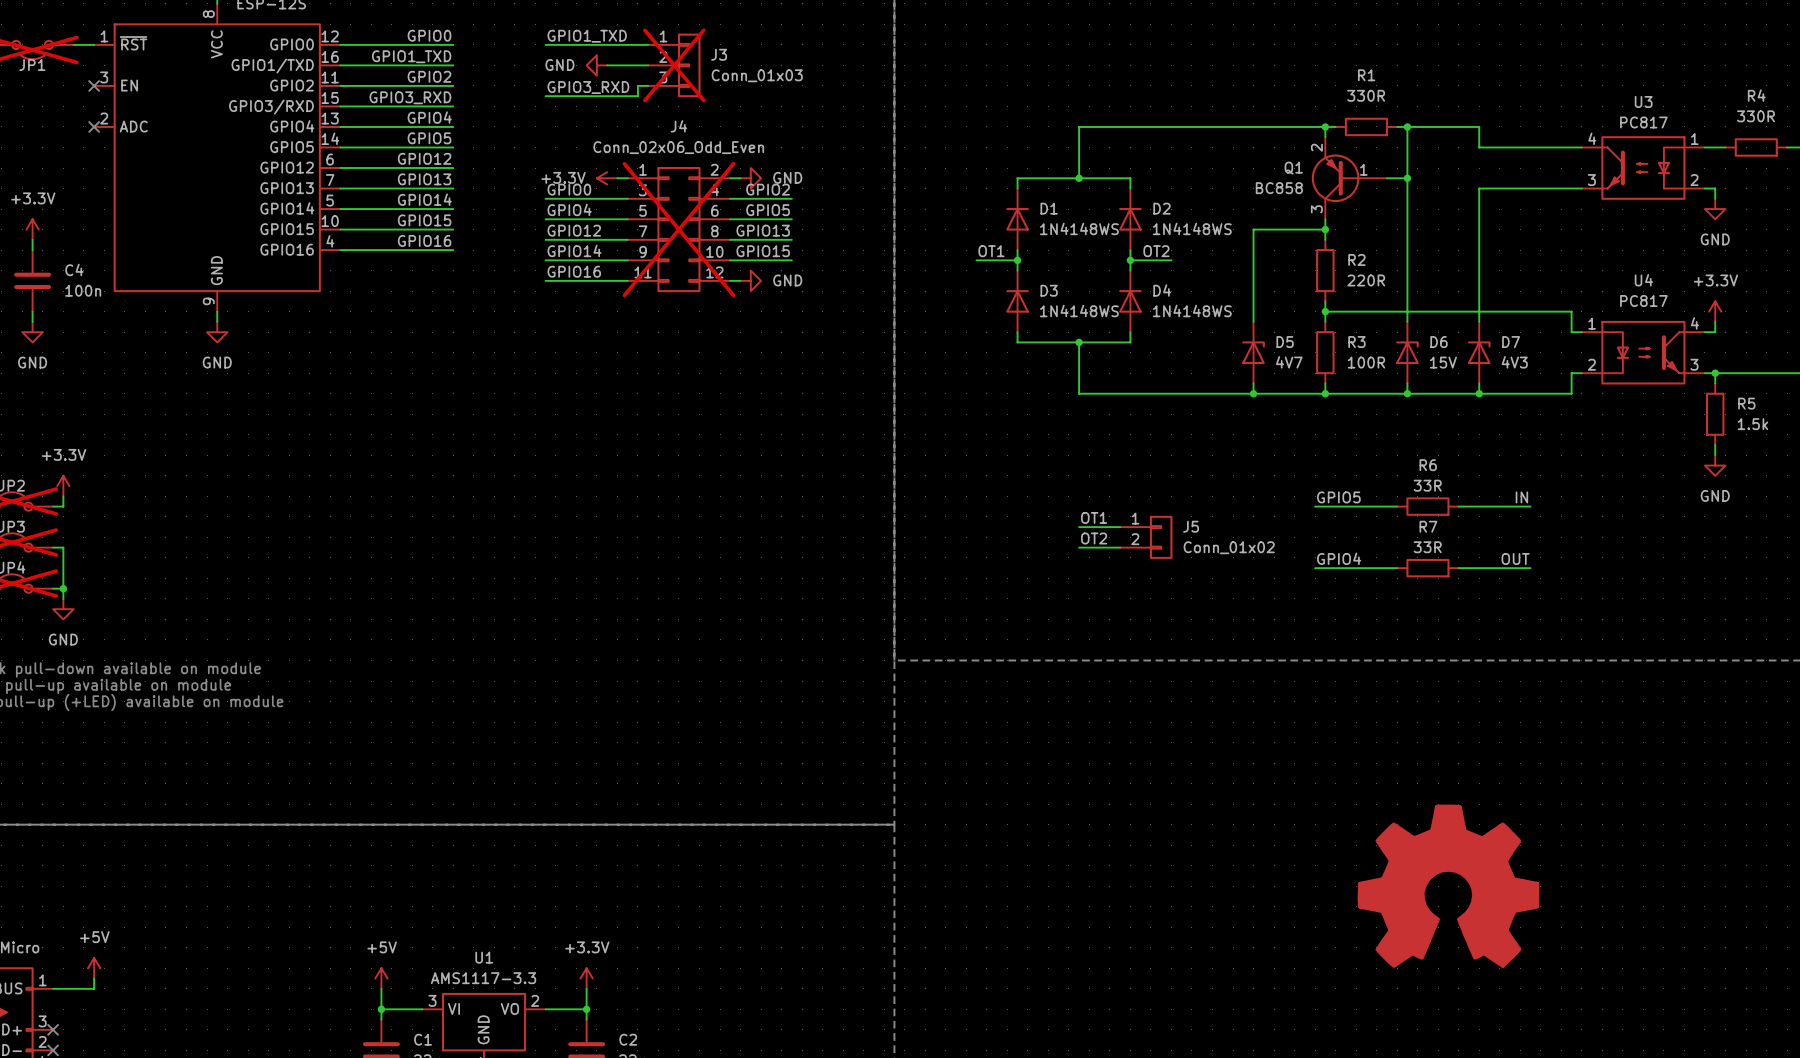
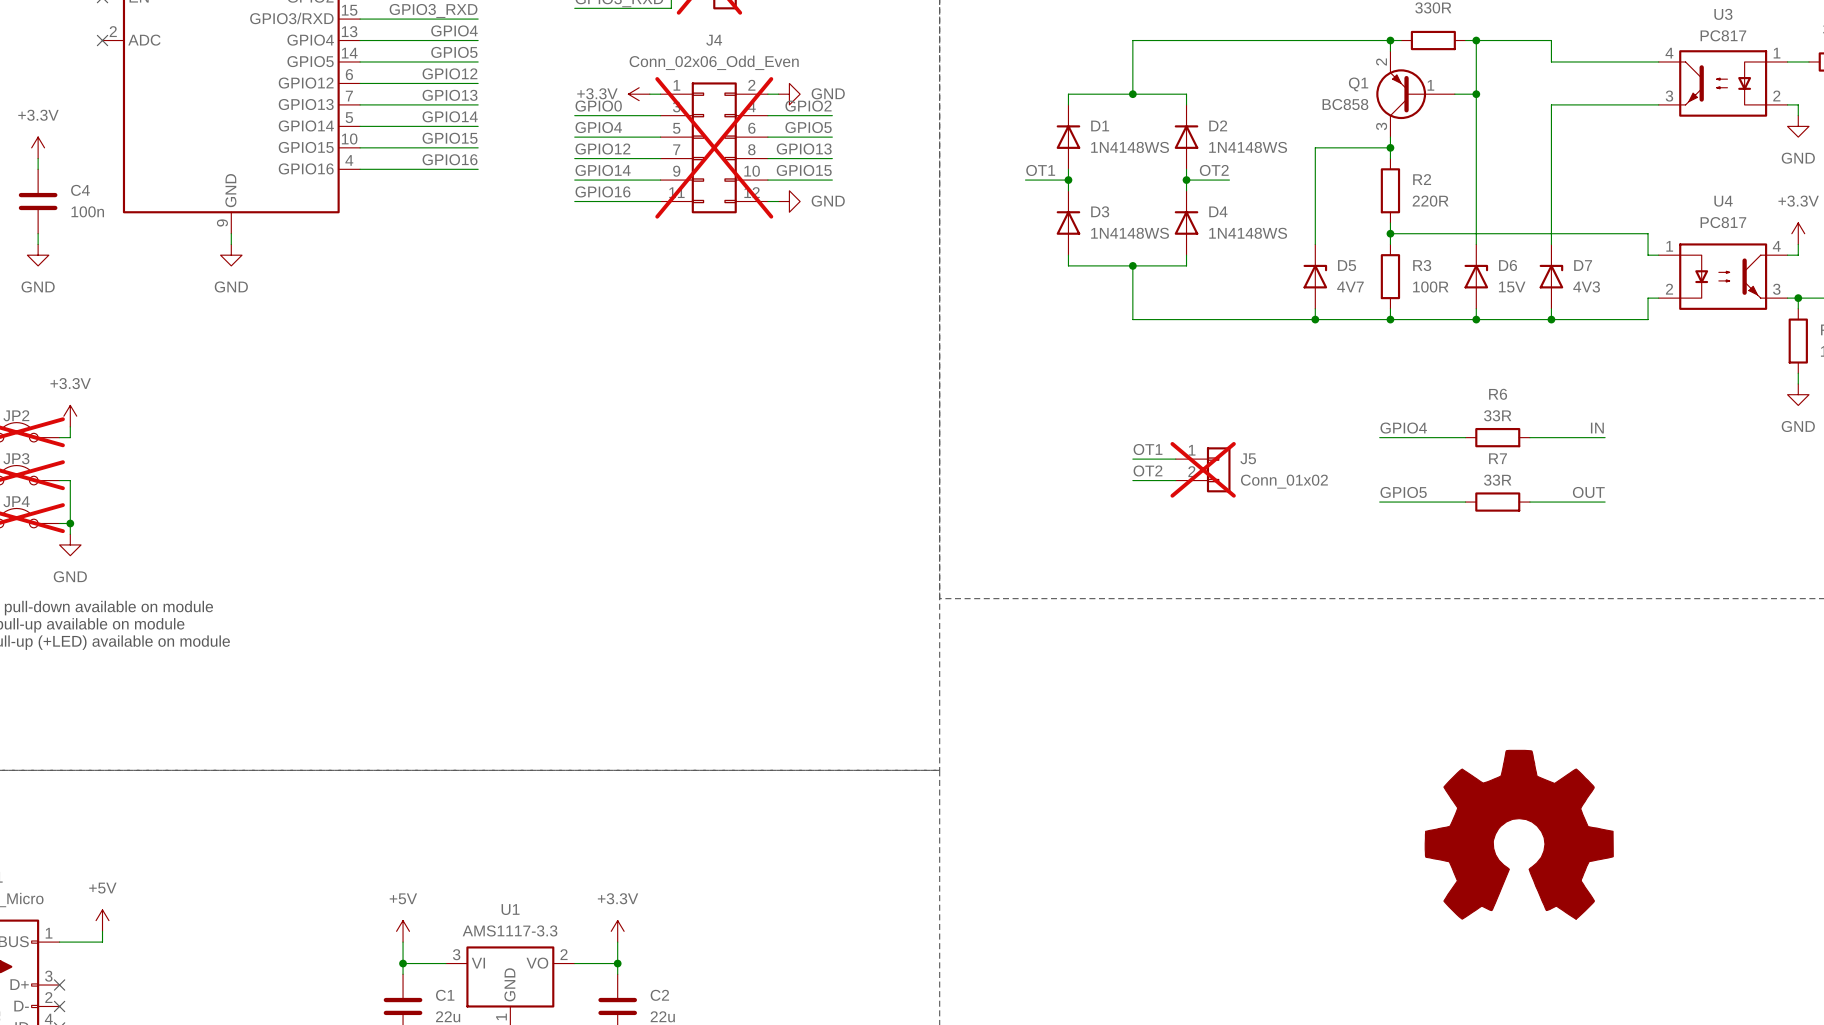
label: GPIO5 (1338, 497) -> GPIO4 (1403, 428)
J5 do-not-place cross: none -> (1203, 469)
label: GPIO4 (1339, 558) -> GPIO5 (1403, 492)

